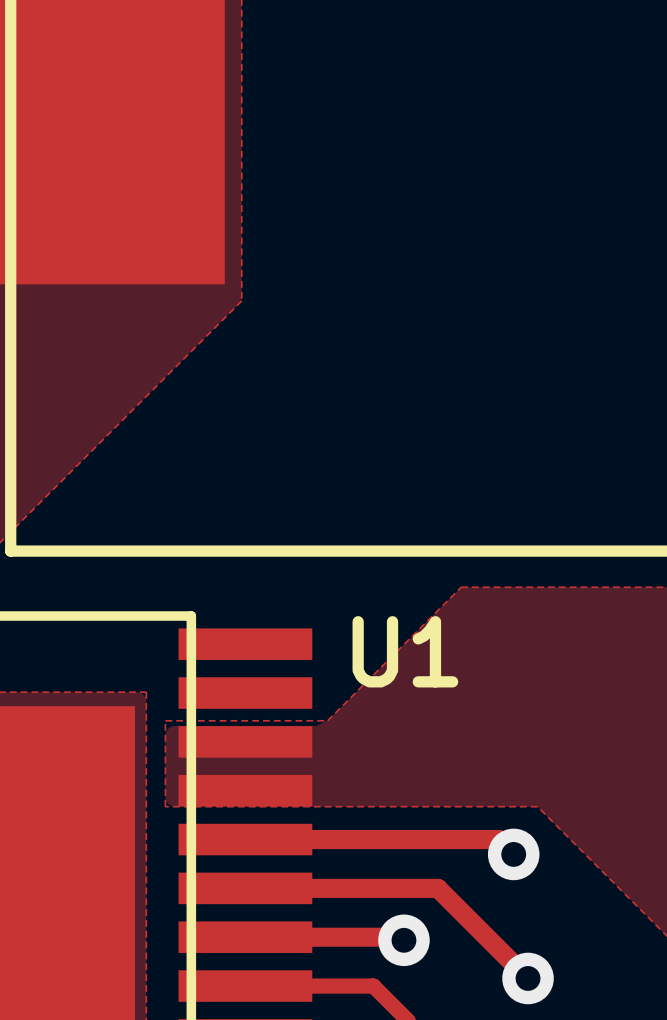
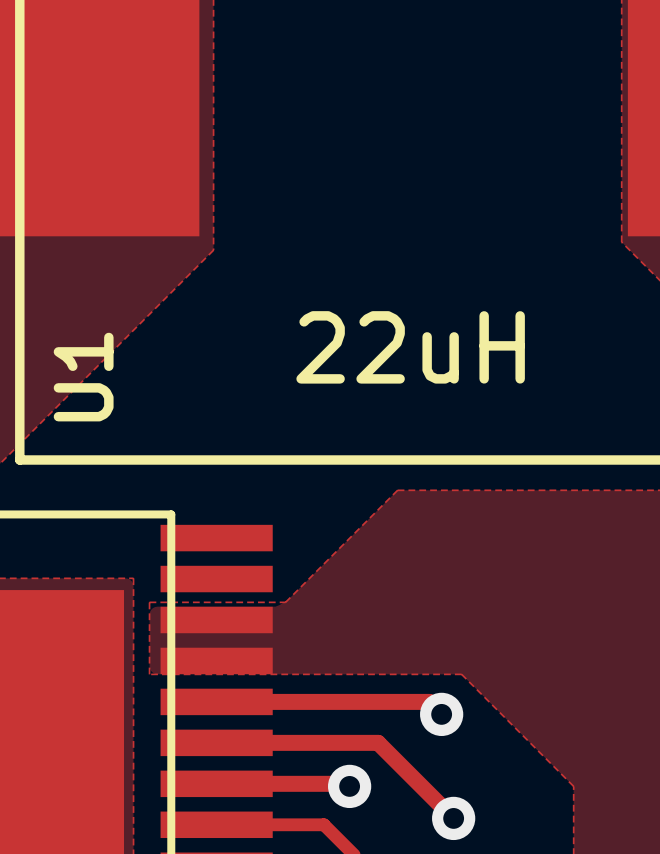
part value: none -> 22uH (410, 347)
U1 name rotation: 0° (405, 651) -> 90° counterclockwise (83, 377)
U1 name position: U1 (405, 651) -> U1 (83, 377)

